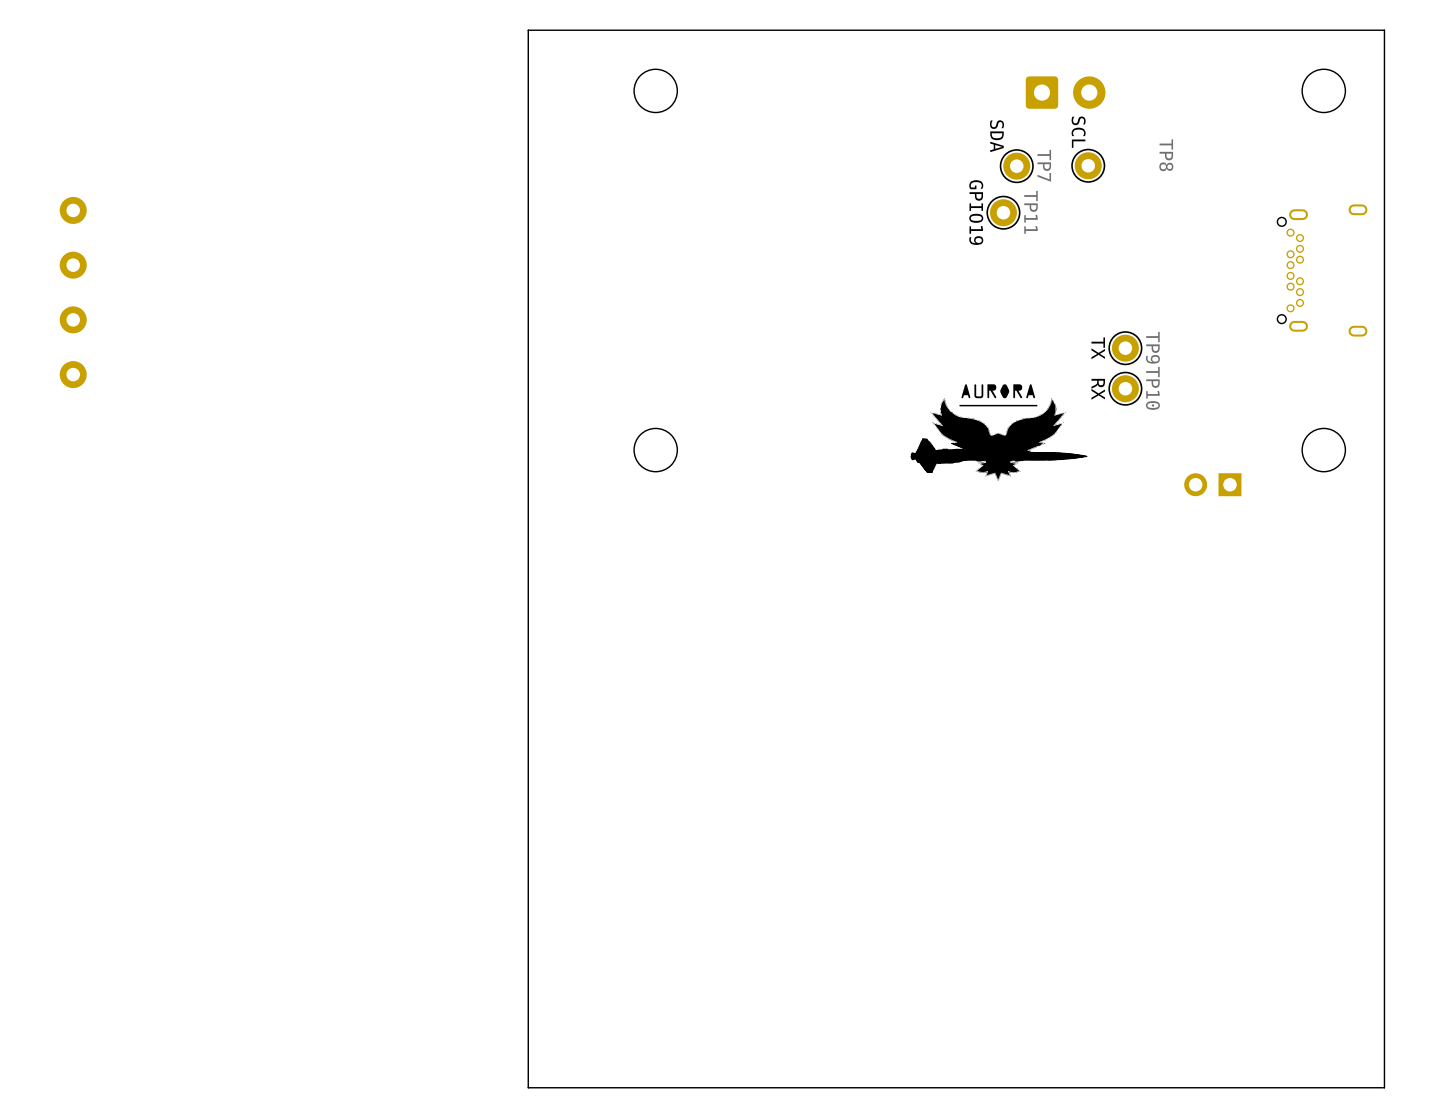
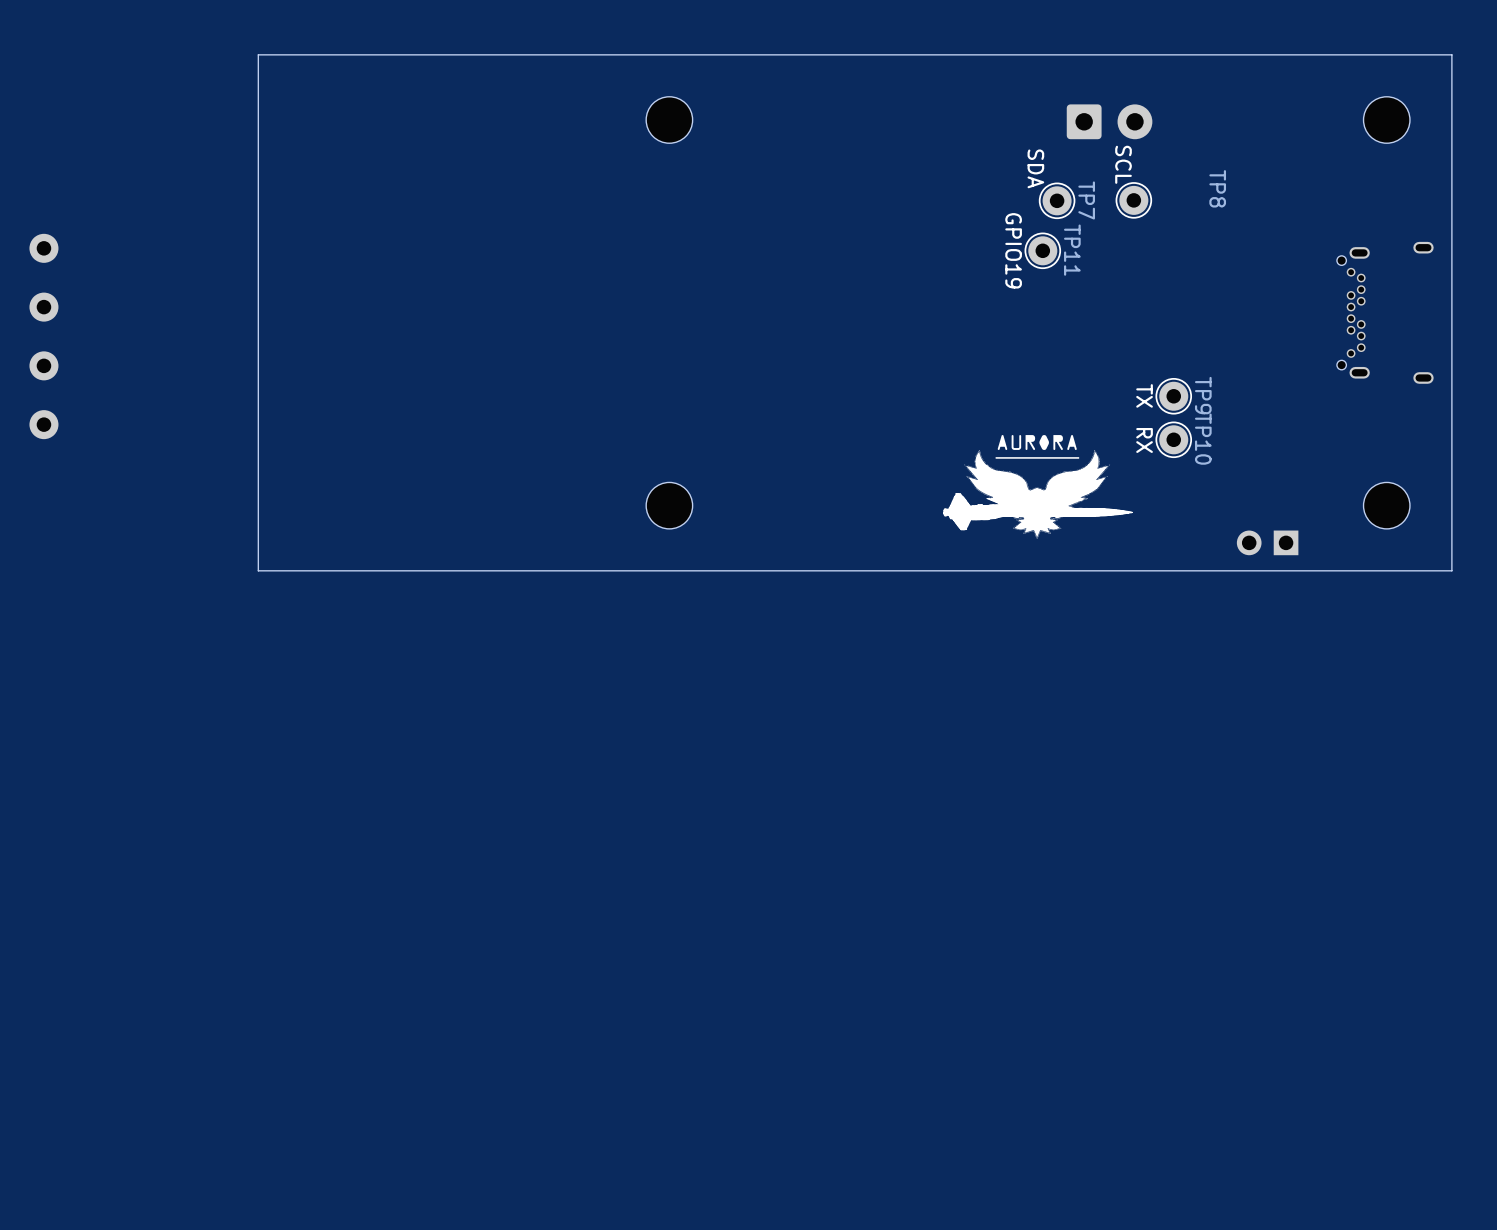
board edge: (528, 30) (528, 1087) (1384, 1087) (1384, 510) -> (532, 54) (258, 54) (258, 570) (1451, 570)

